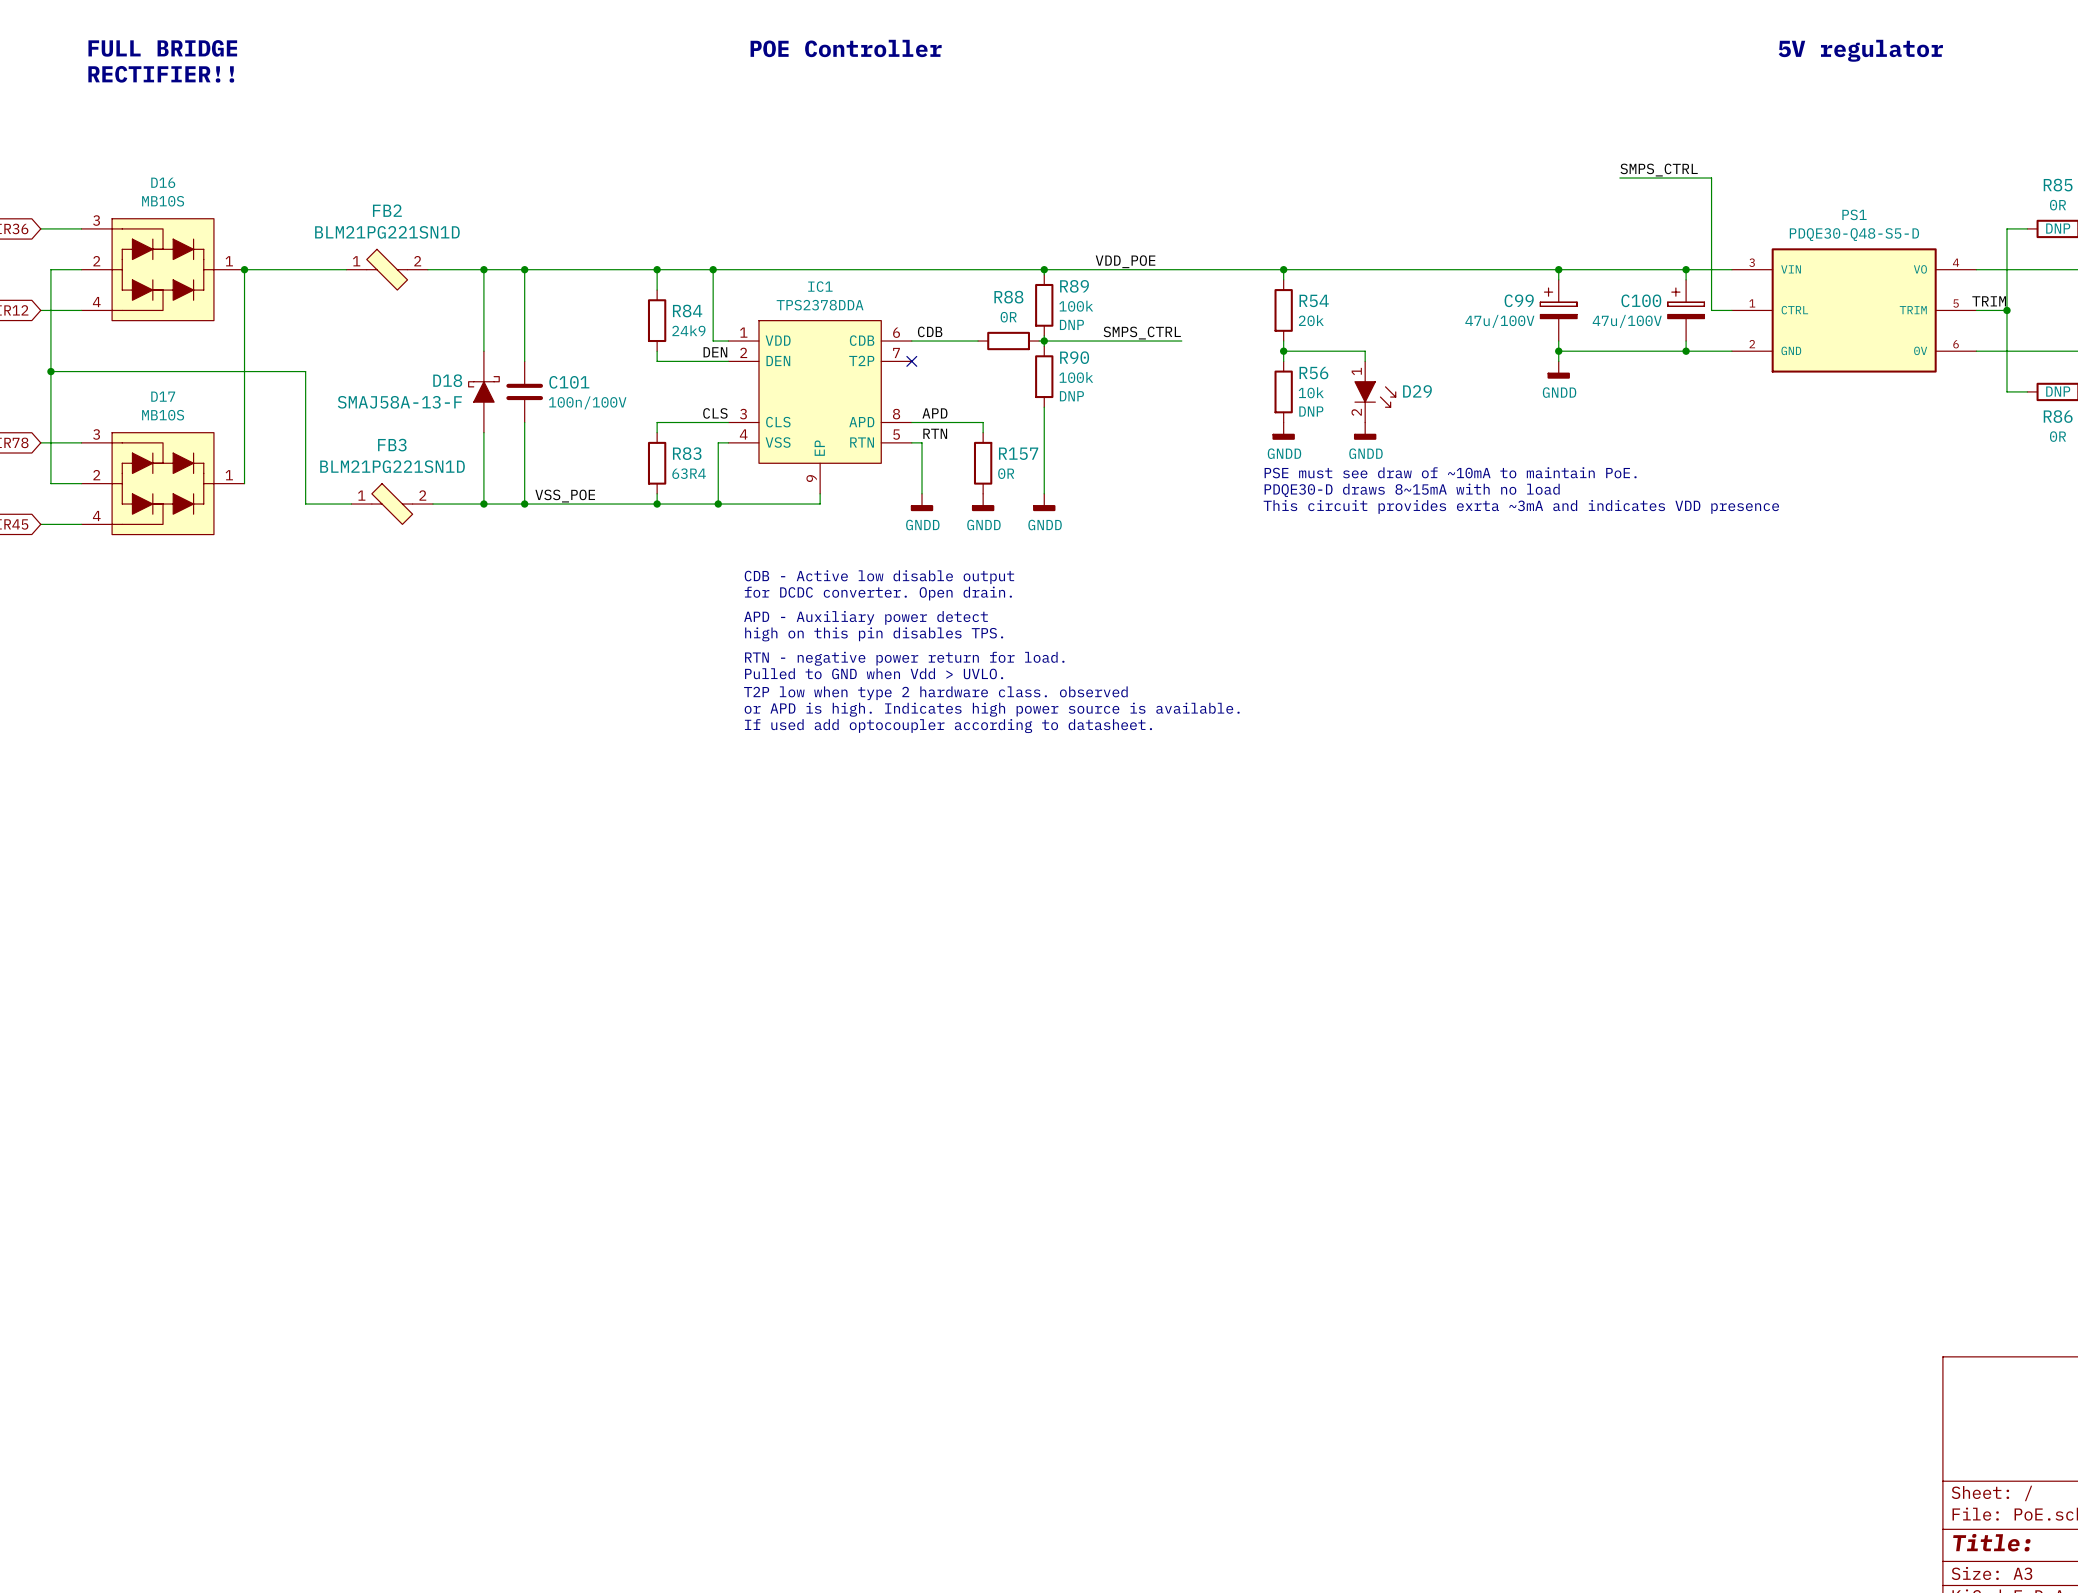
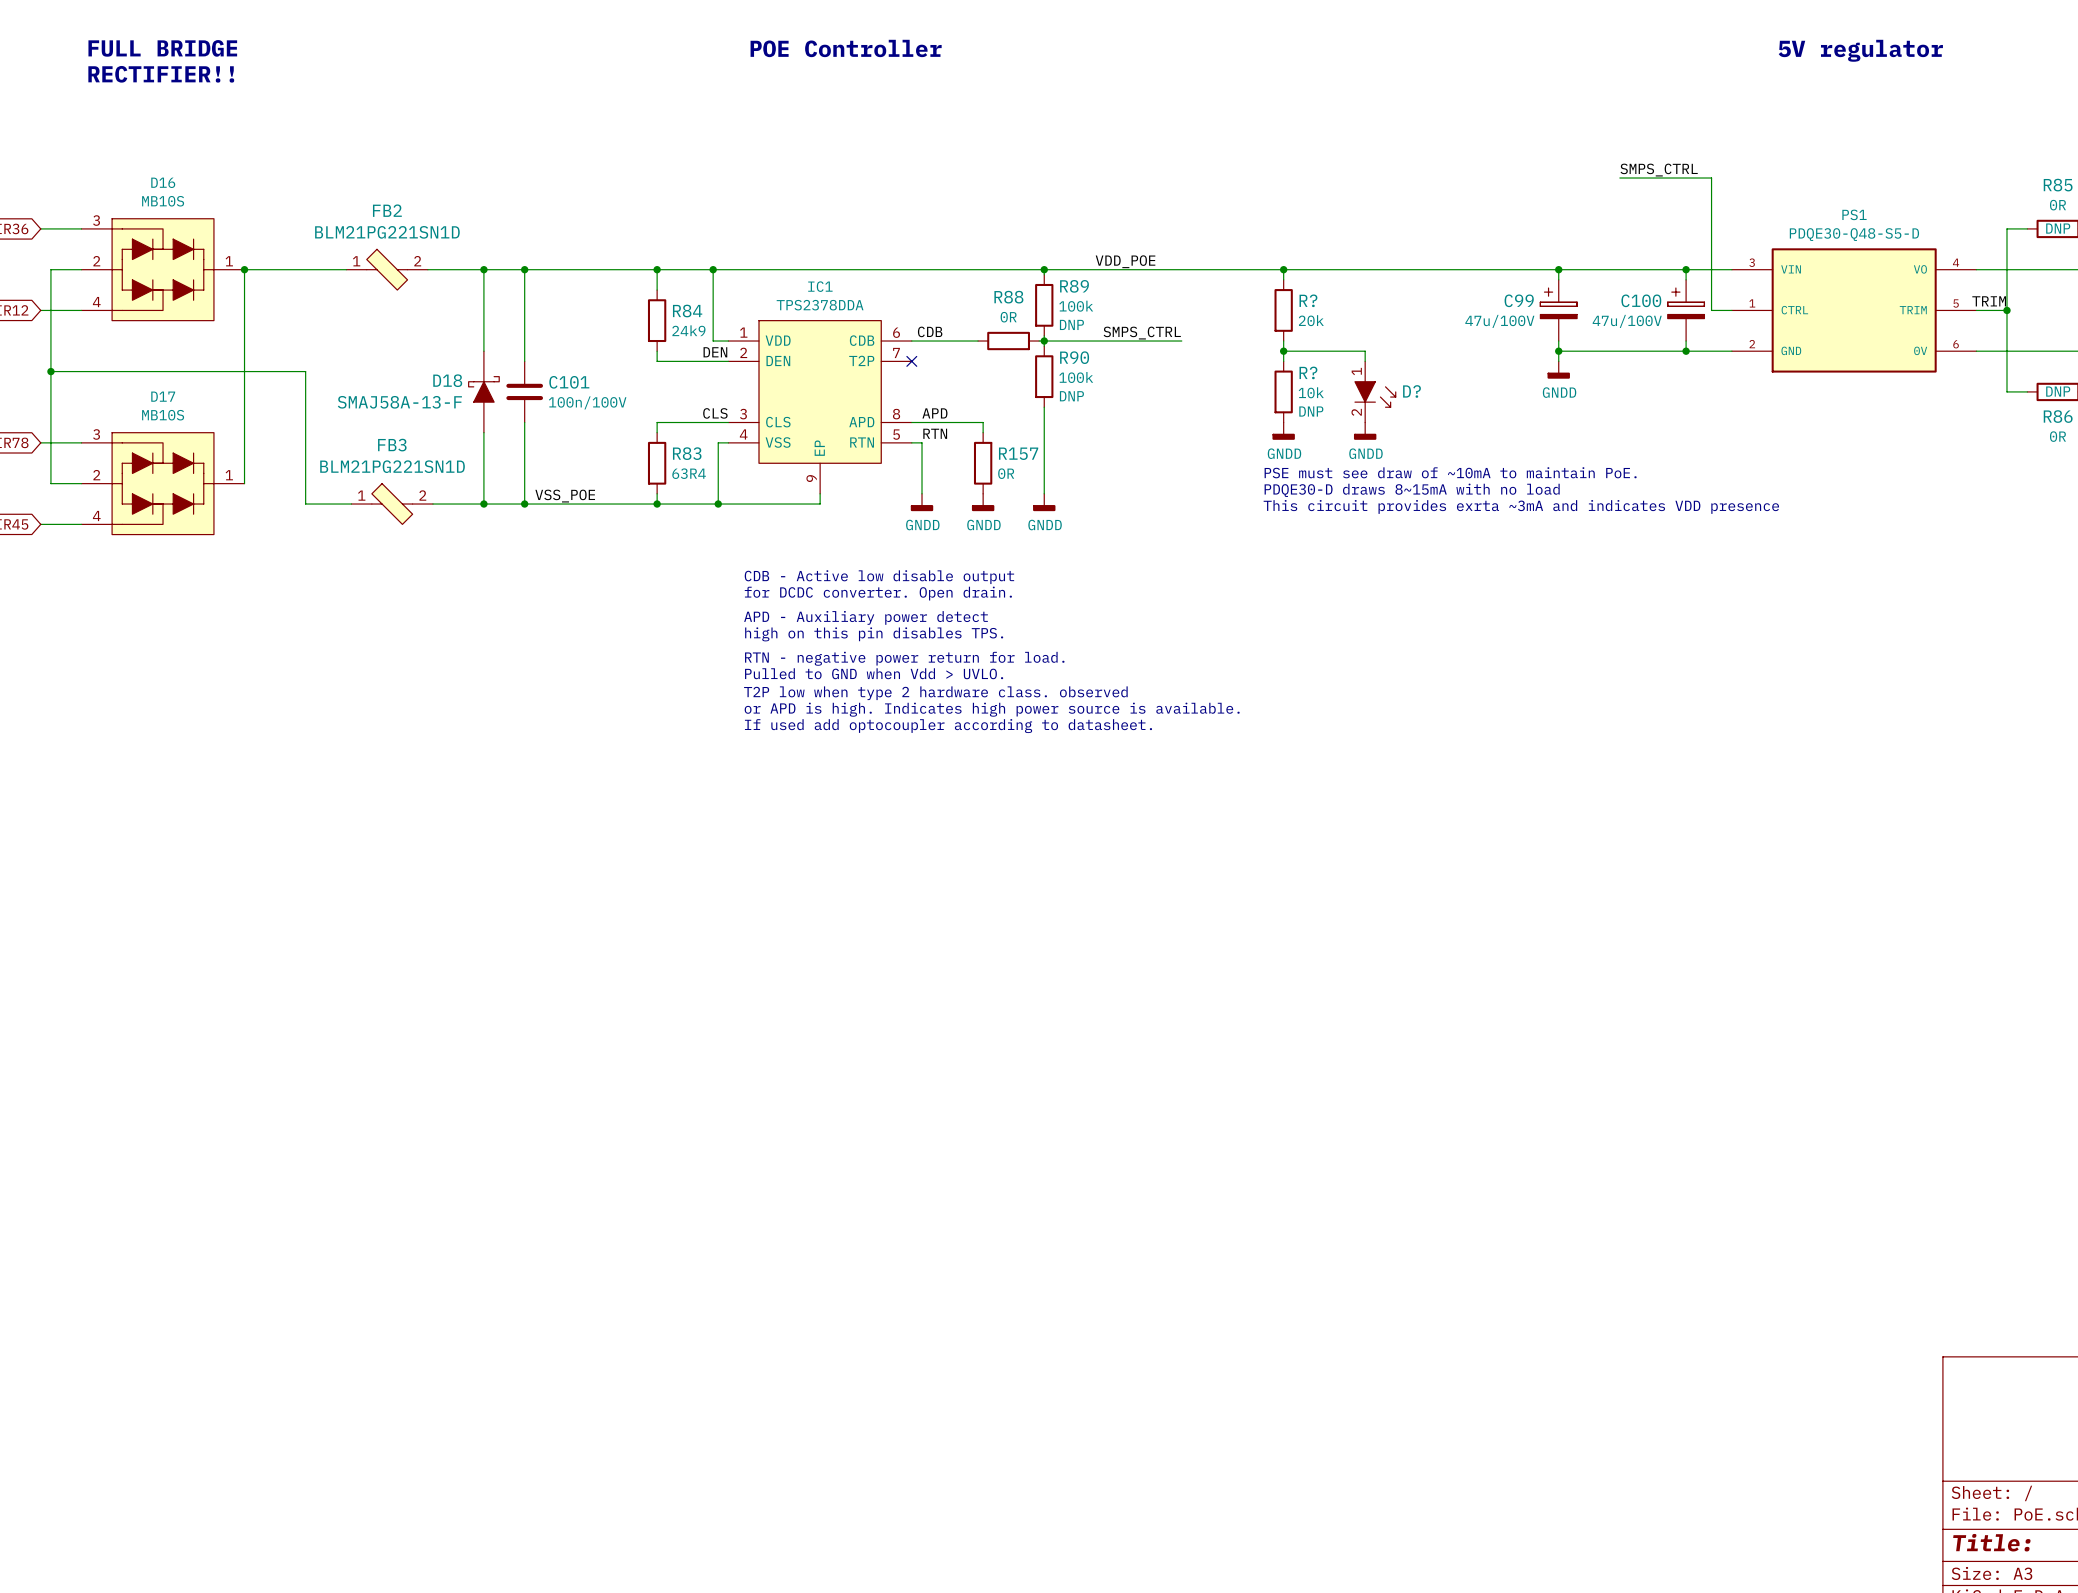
R54 name: R54 (1314, 300) -> R? (1308, 300)
R56 name: R56 (1313, 373) -> R? (1308, 372)
D29 name: D29 (1417, 391) -> D? (1411, 391)

